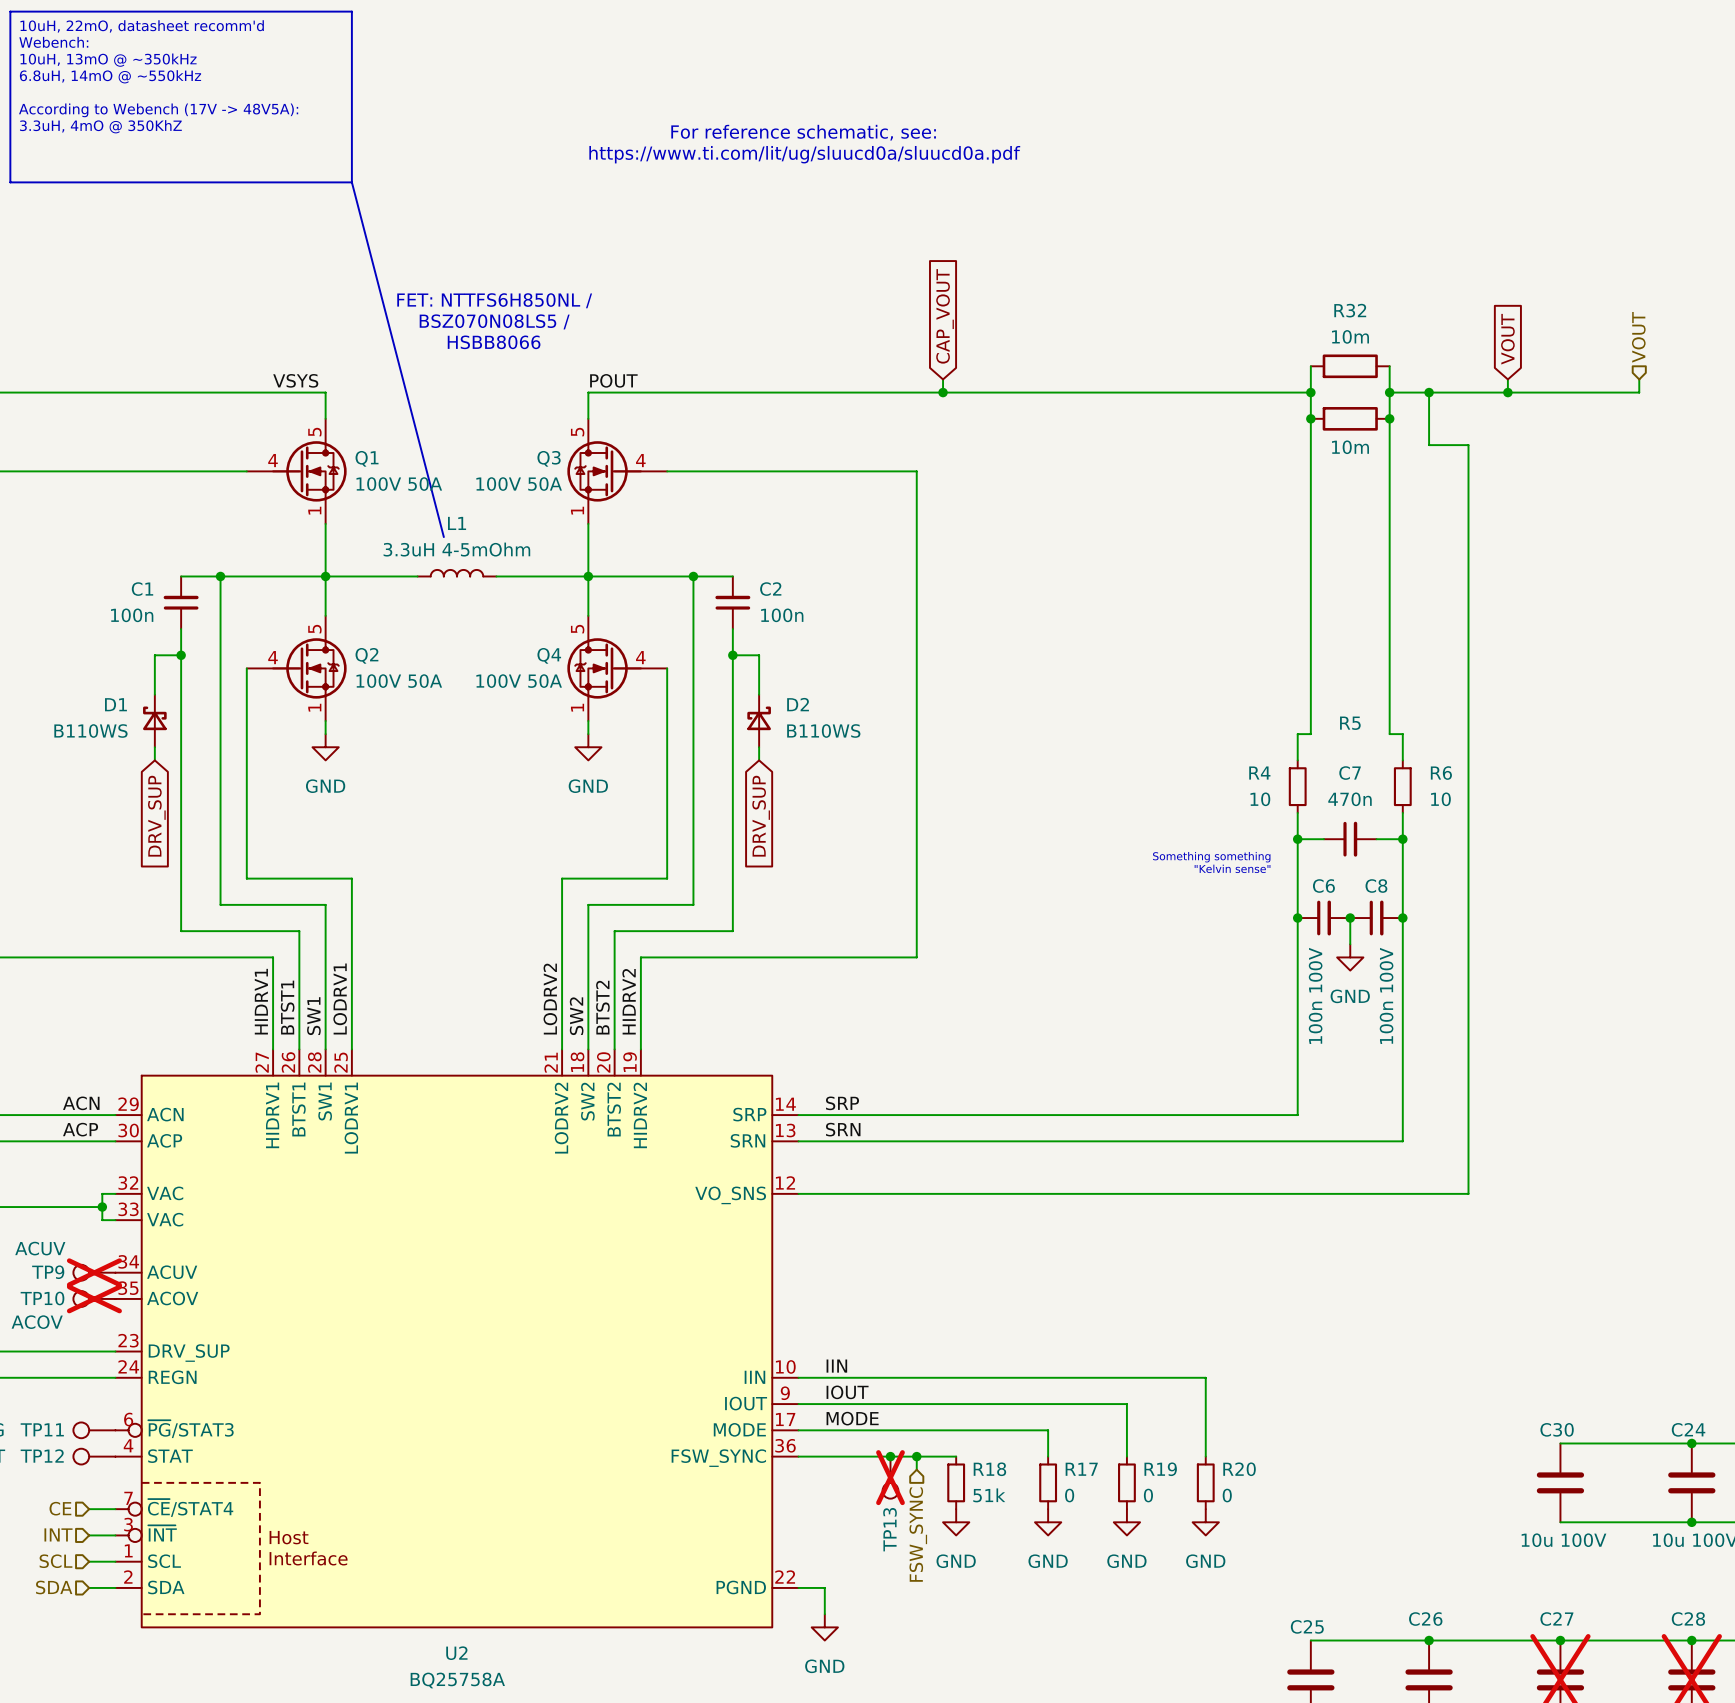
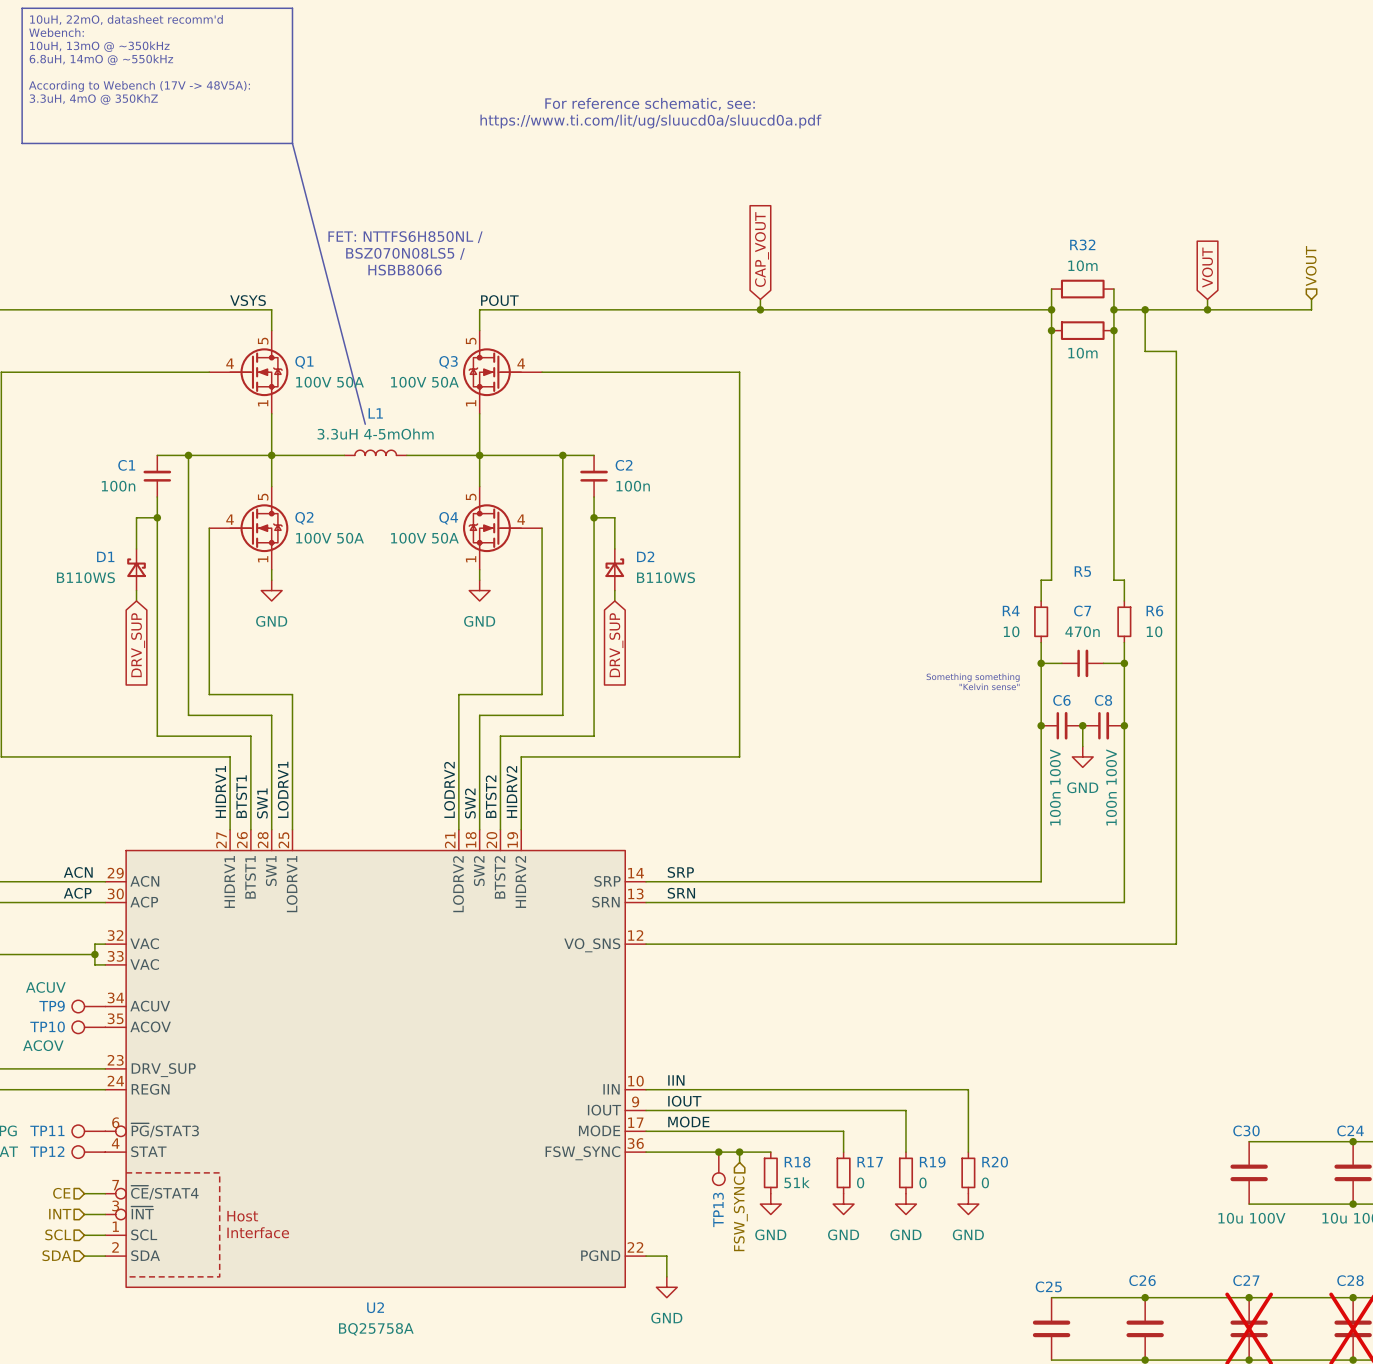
TP9 do-not-place cross: (94, 1272) -> none
TP10 do-not-place cross: (94, 1298) -> none
TP13 do-not-place cross: (890, 1477) -> none

